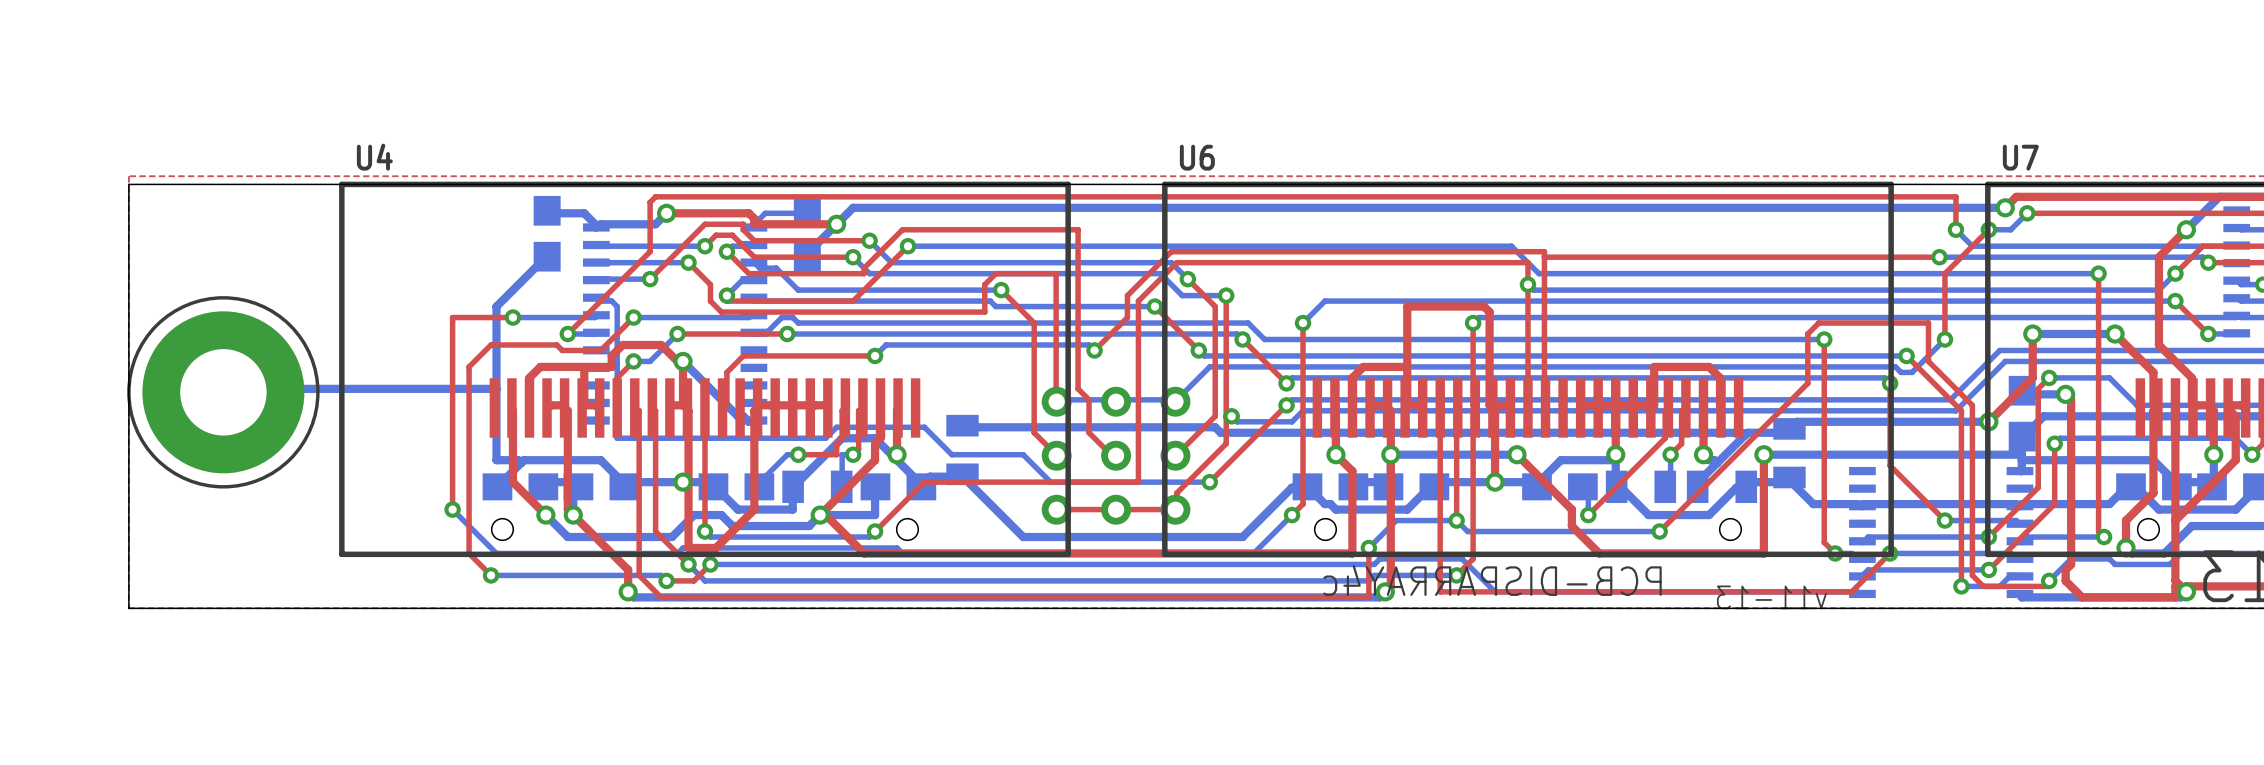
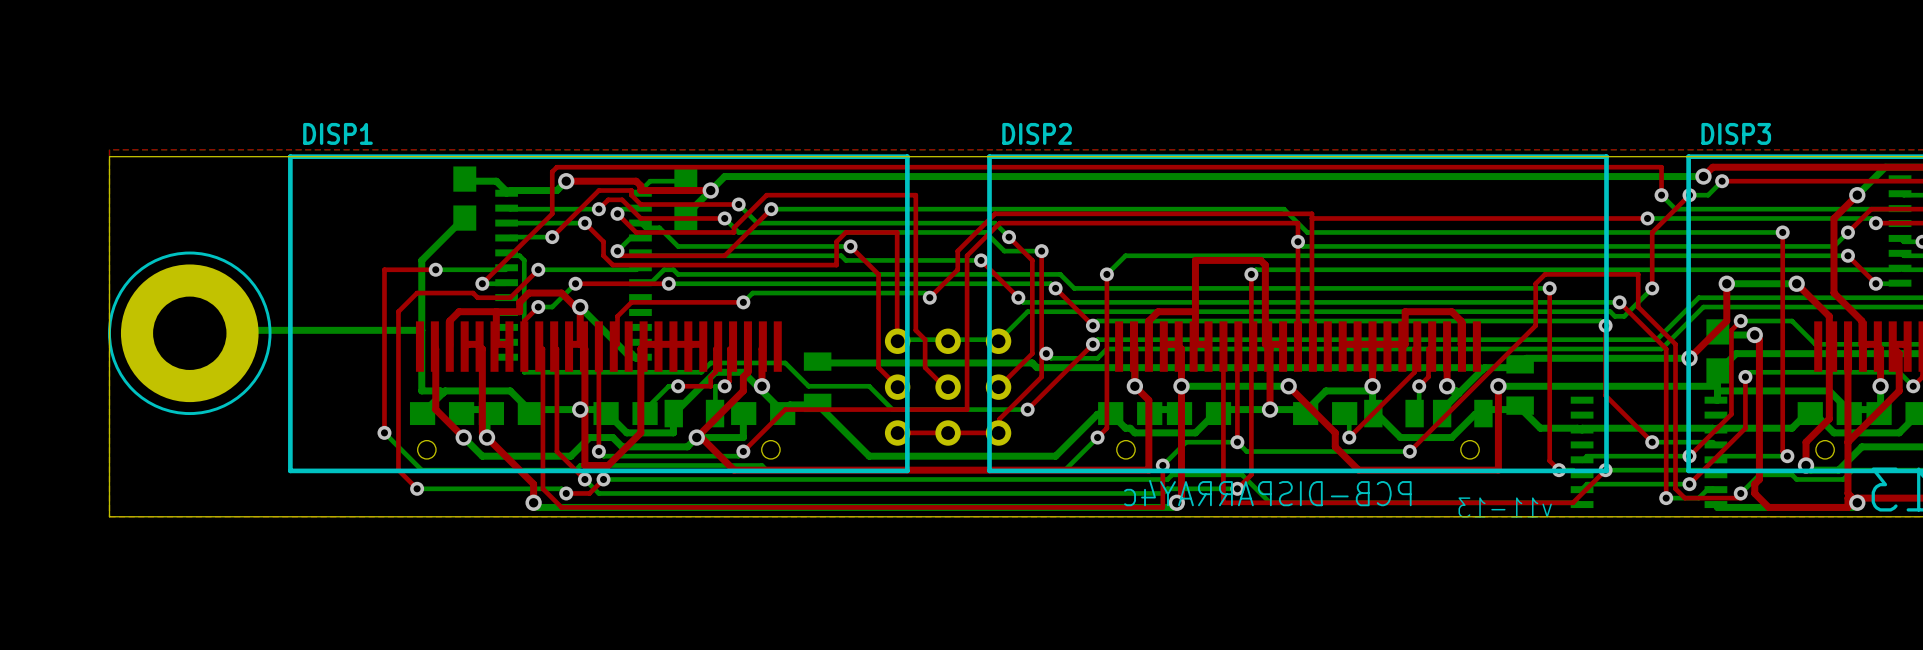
U4 name: U4 (374, 157) -> DISP1 (337, 133)
U6 name: U6 (1197, 157) -> DISP2 (1037, 133)
U7 name: U7 (2020, 157) -> DISP3 (1736, 133)

